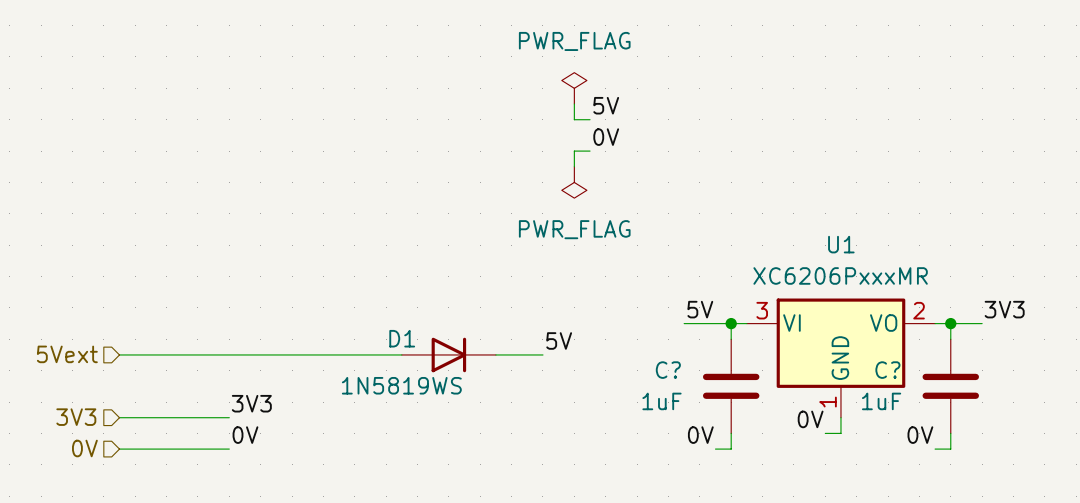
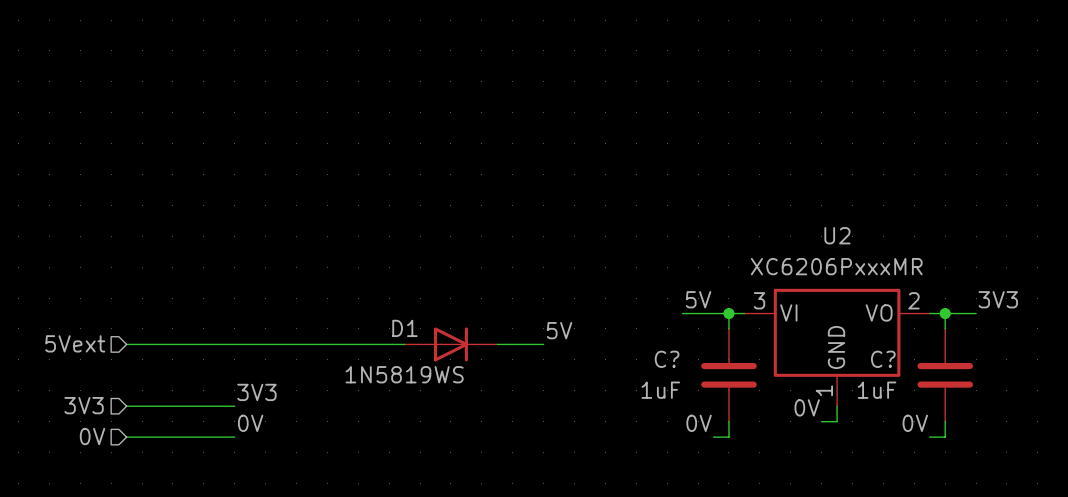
power symbol: PWR_FLAG (574, 88) -> none
wire: (574, 104) (574, 119) (590, 119) -> none
label: 5V (606, 105) -> none
label: 0V (606, 137) -> none
wire: (590, 151) (574, 151) (574, 166) -> none
power symbol: PWR_FLAG (574, 182) -> none
U1 name: U1 (841, 244) -> U2 (837, 235)

